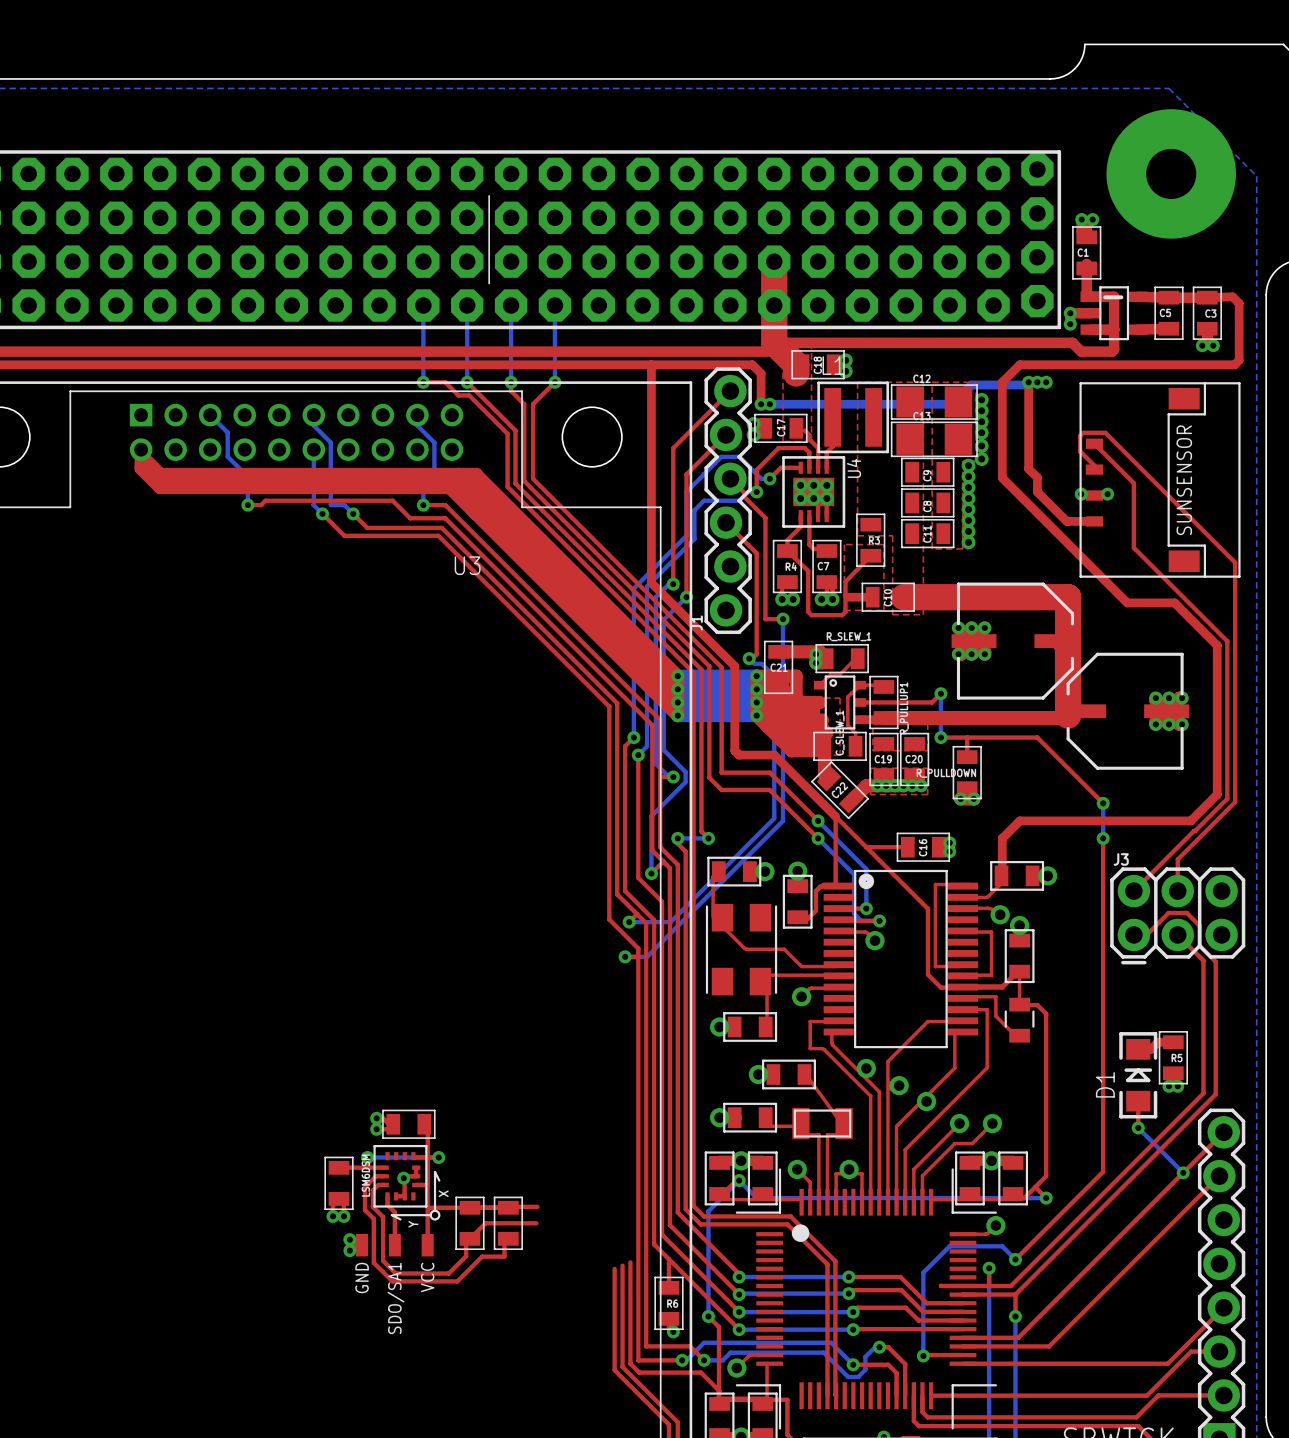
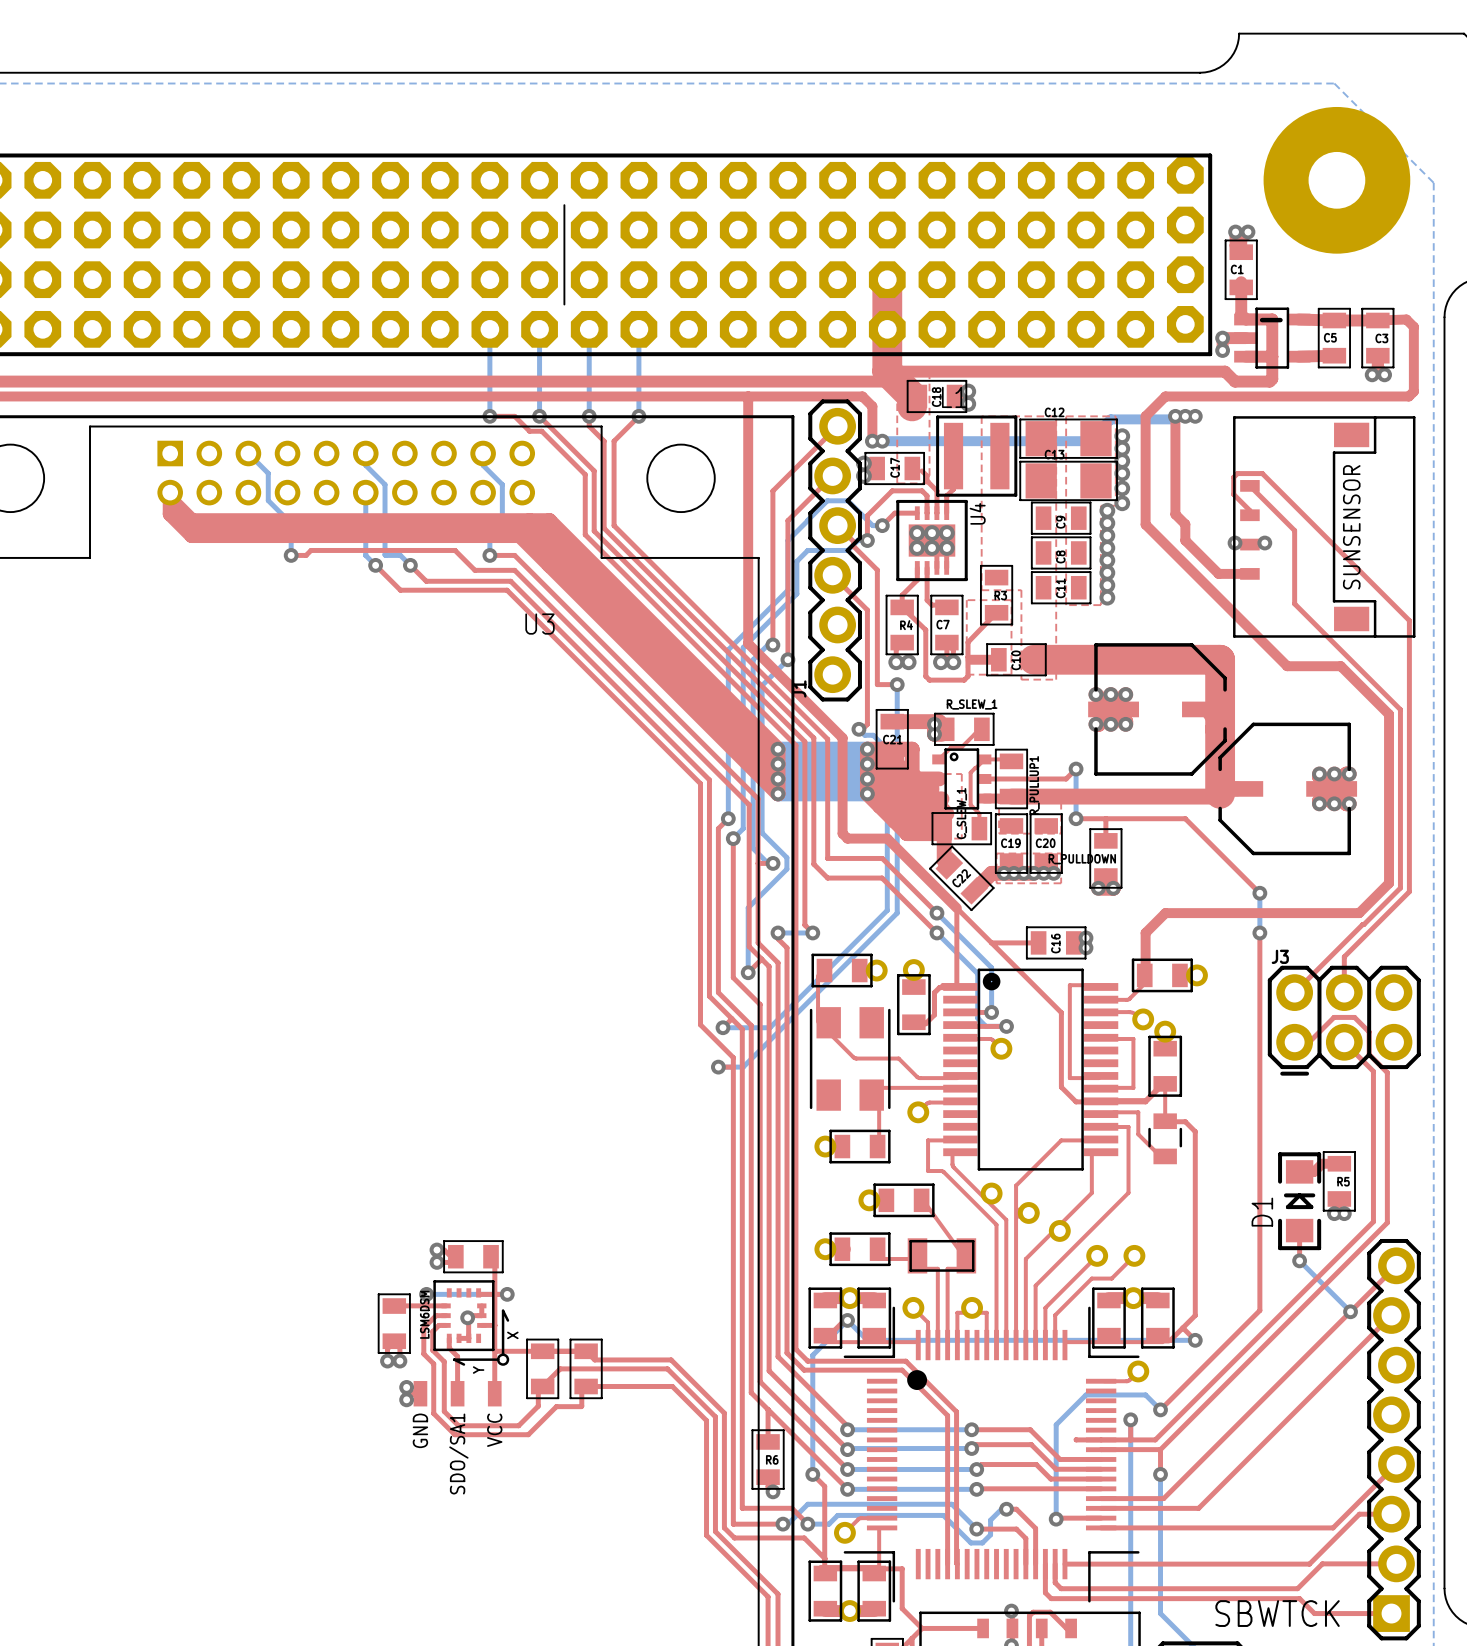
top track: (537, 1206) (508, 1207) -> (724, 1413) (671, 1359) (594, 1359) (586, 1351)
top track: none -> (617, 1368) (667, 1368) (715, 1416)
top track: none -> (586, 1386) (672, 1386) (706, 1420)

